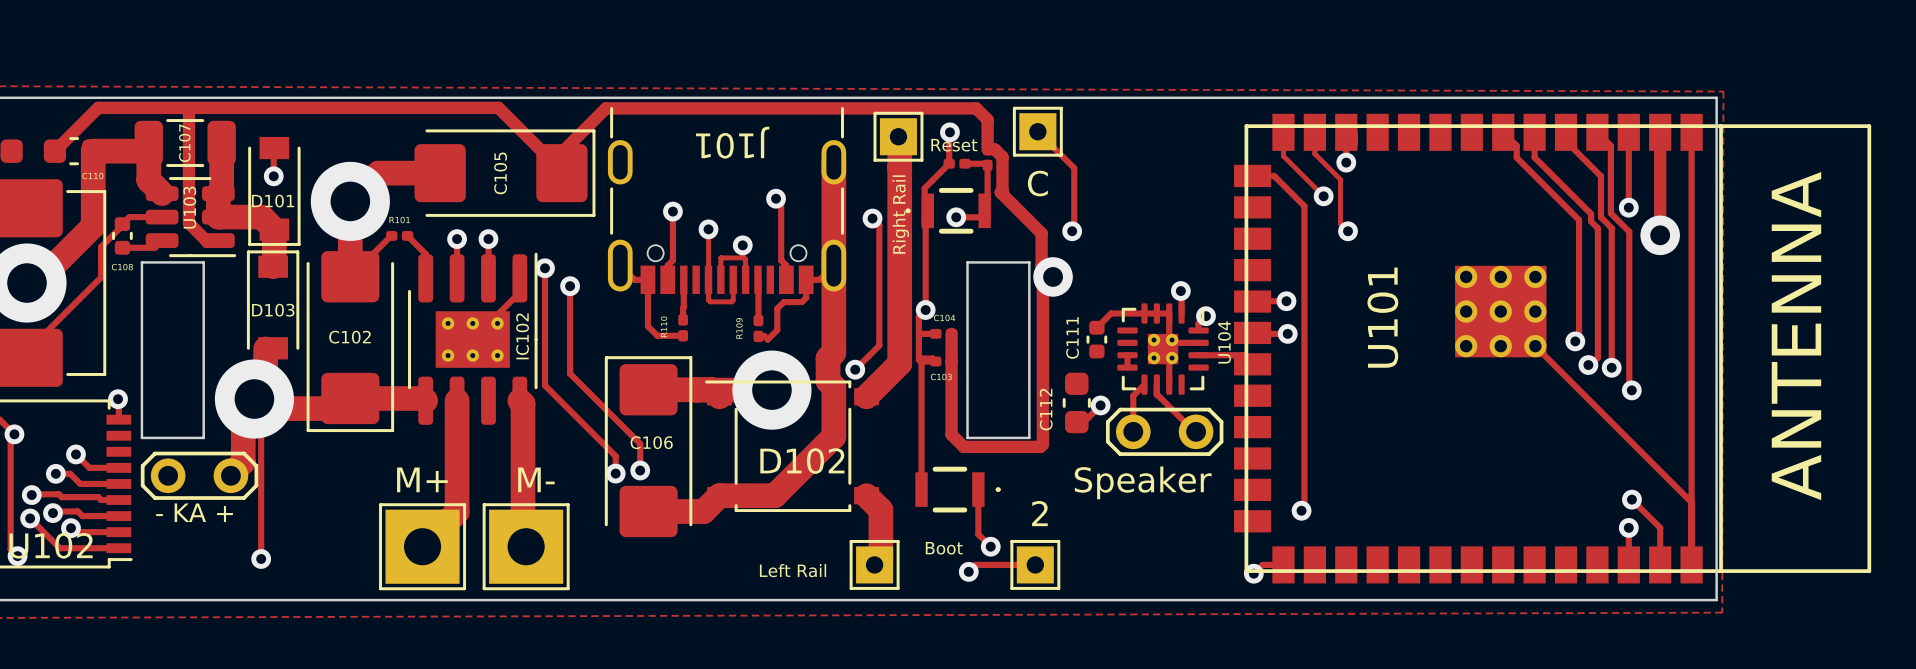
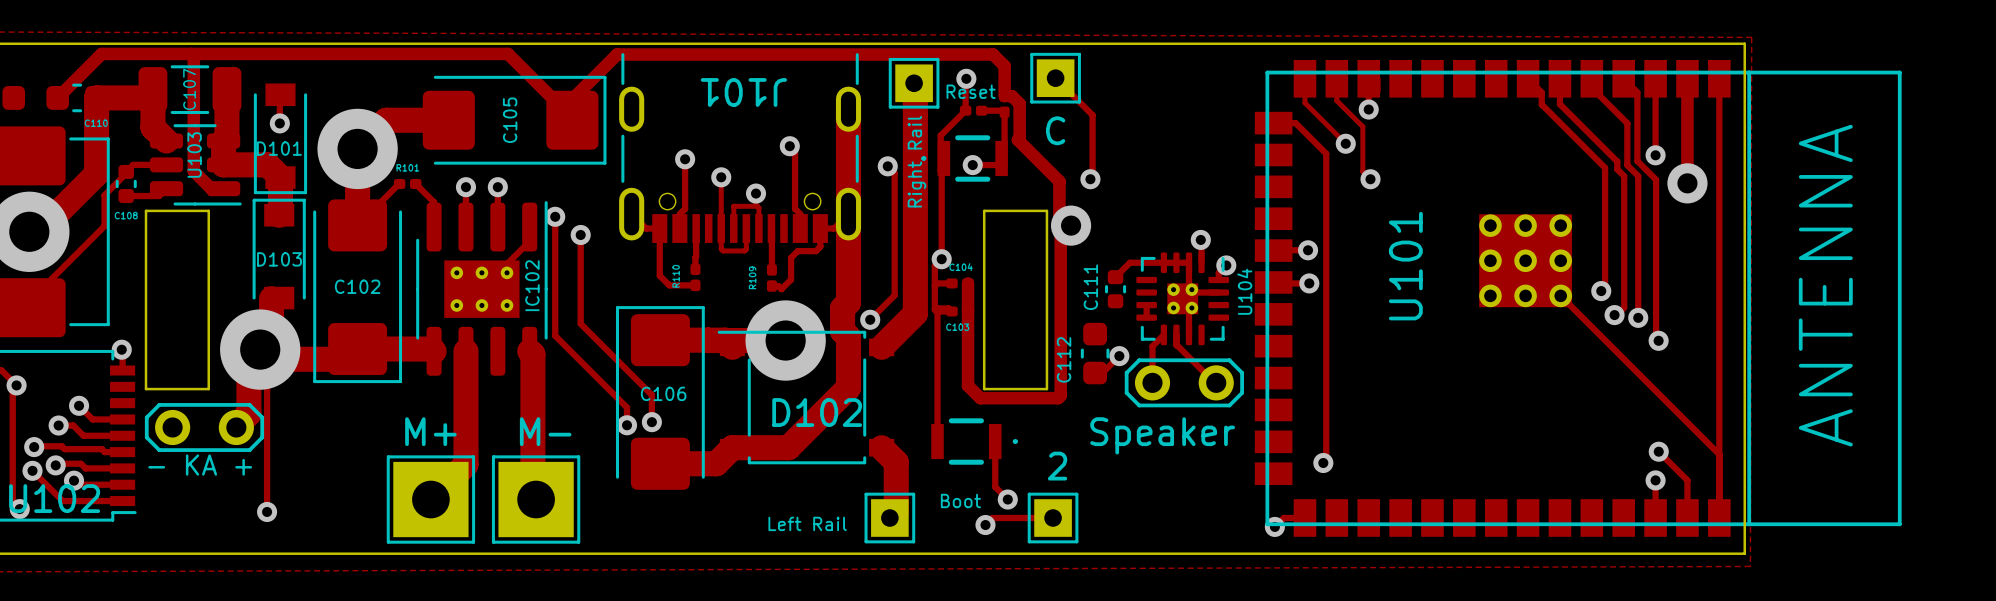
track: (1198, 355) (1243, 355) (1252, 364) -> none

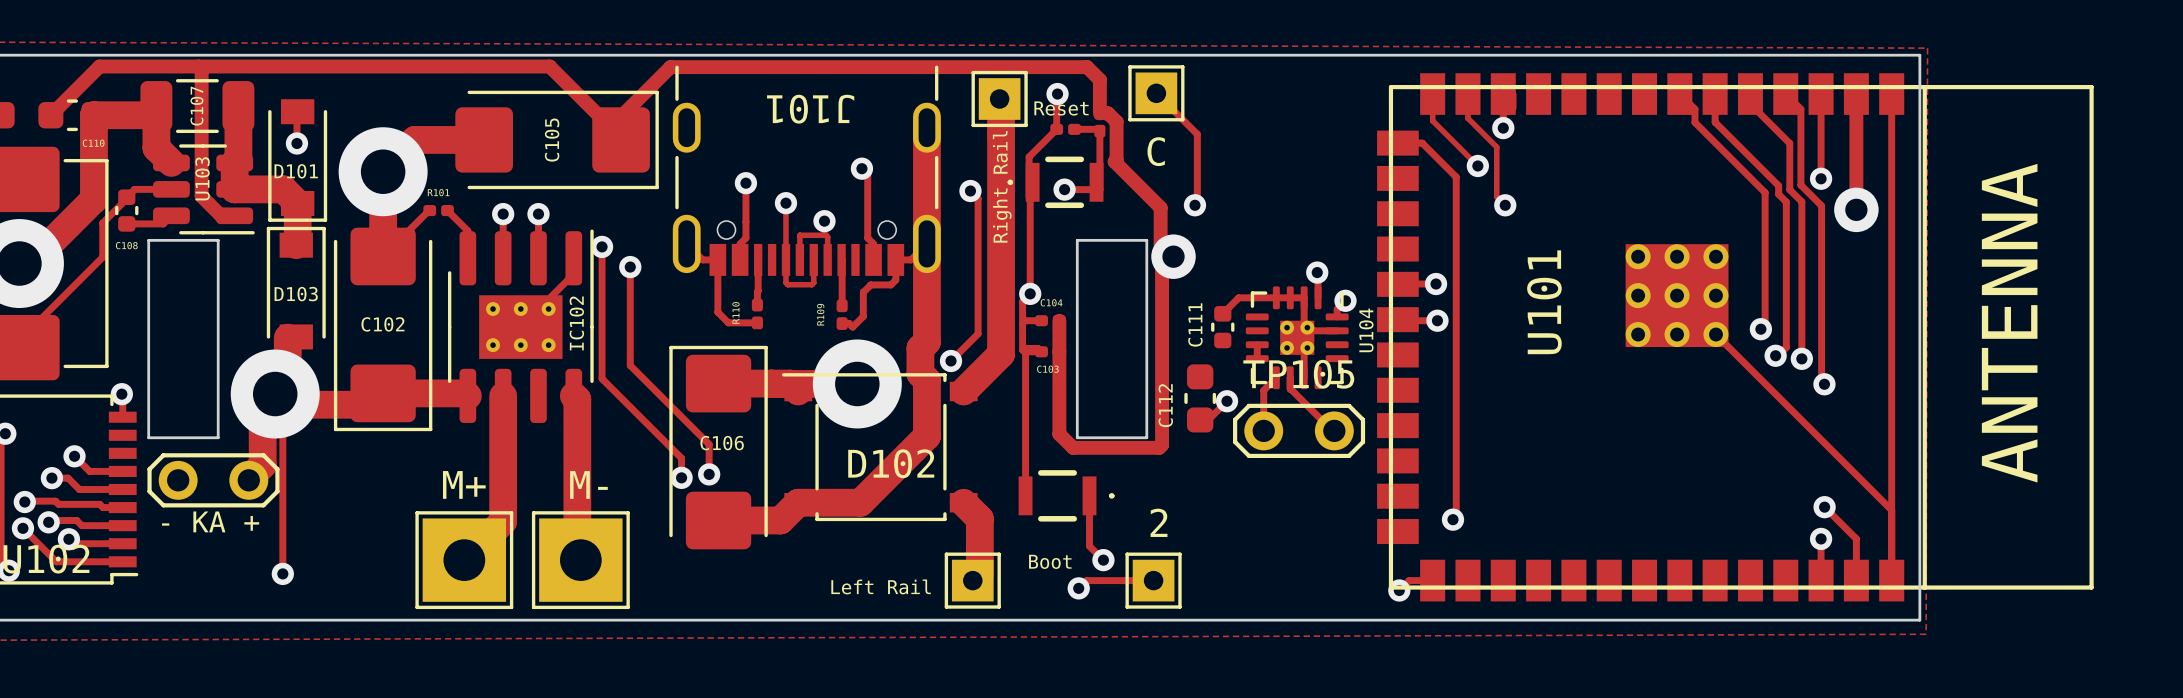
TP105 name: none -> TP105 (1298, 374)
TP105 value: Speaker (1162, 435) -> none

